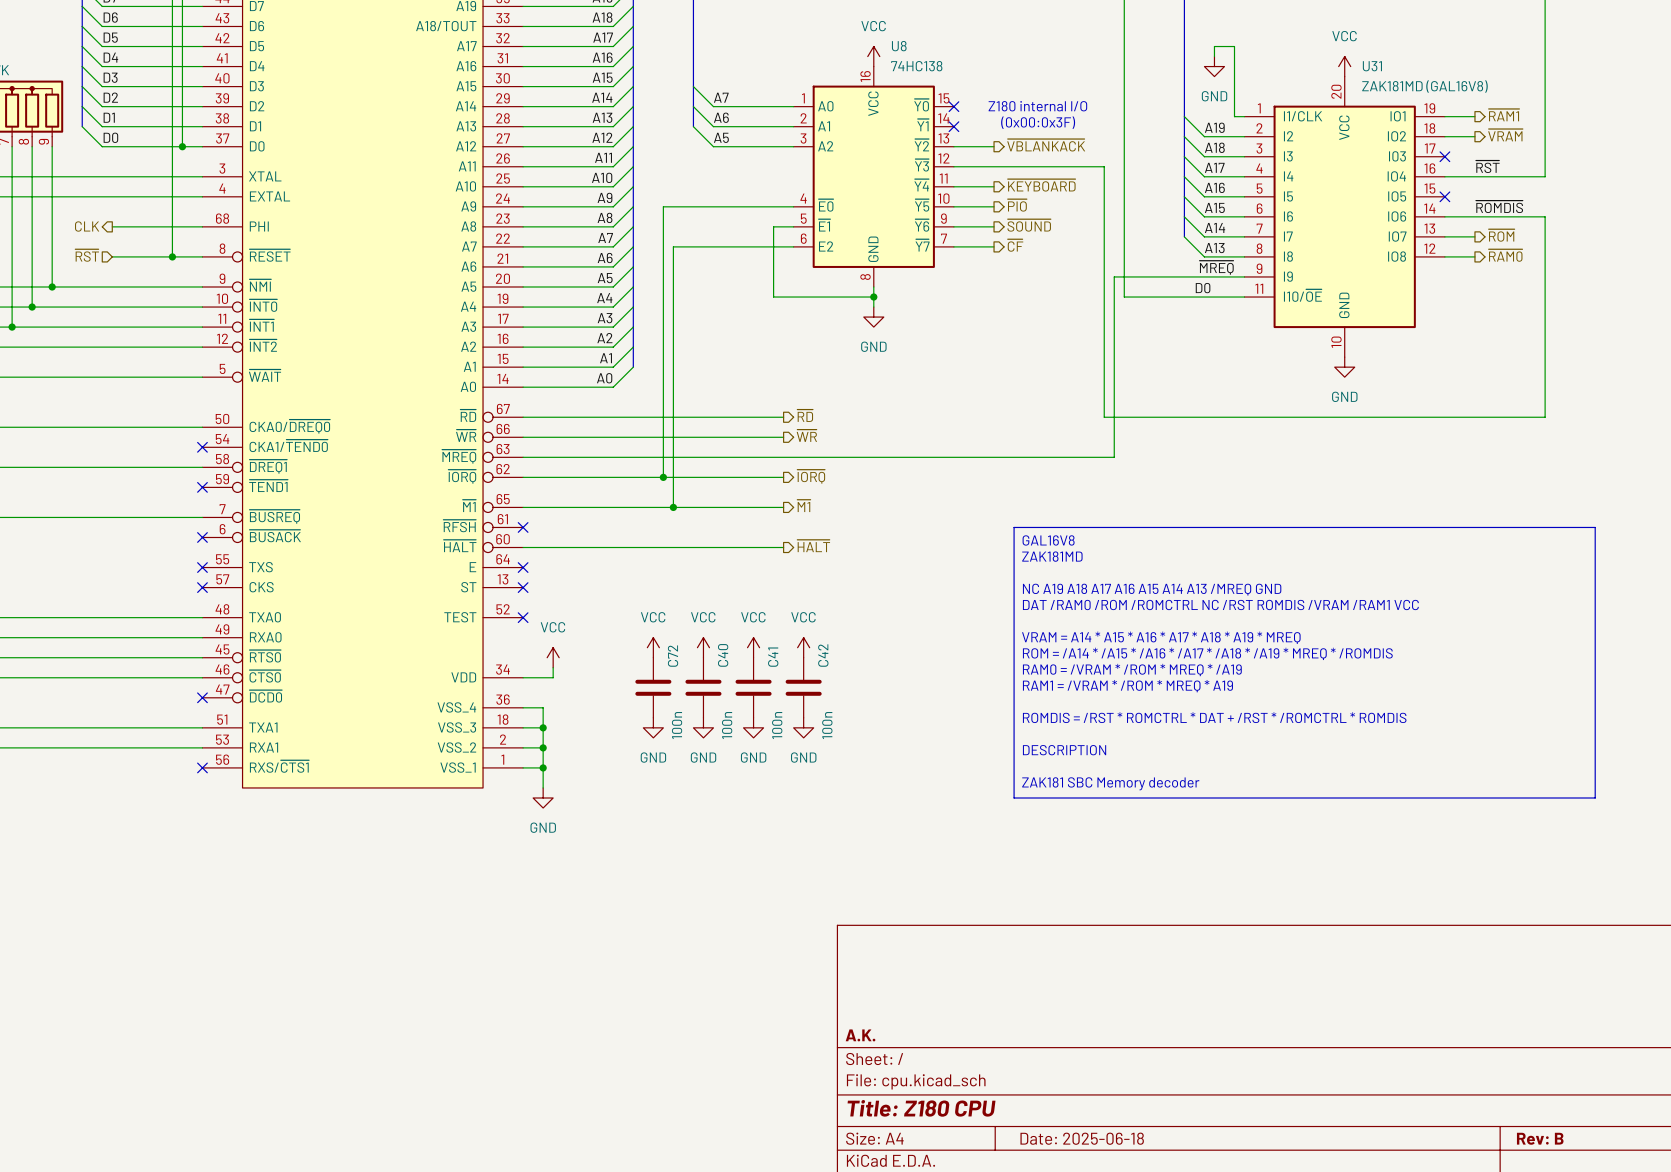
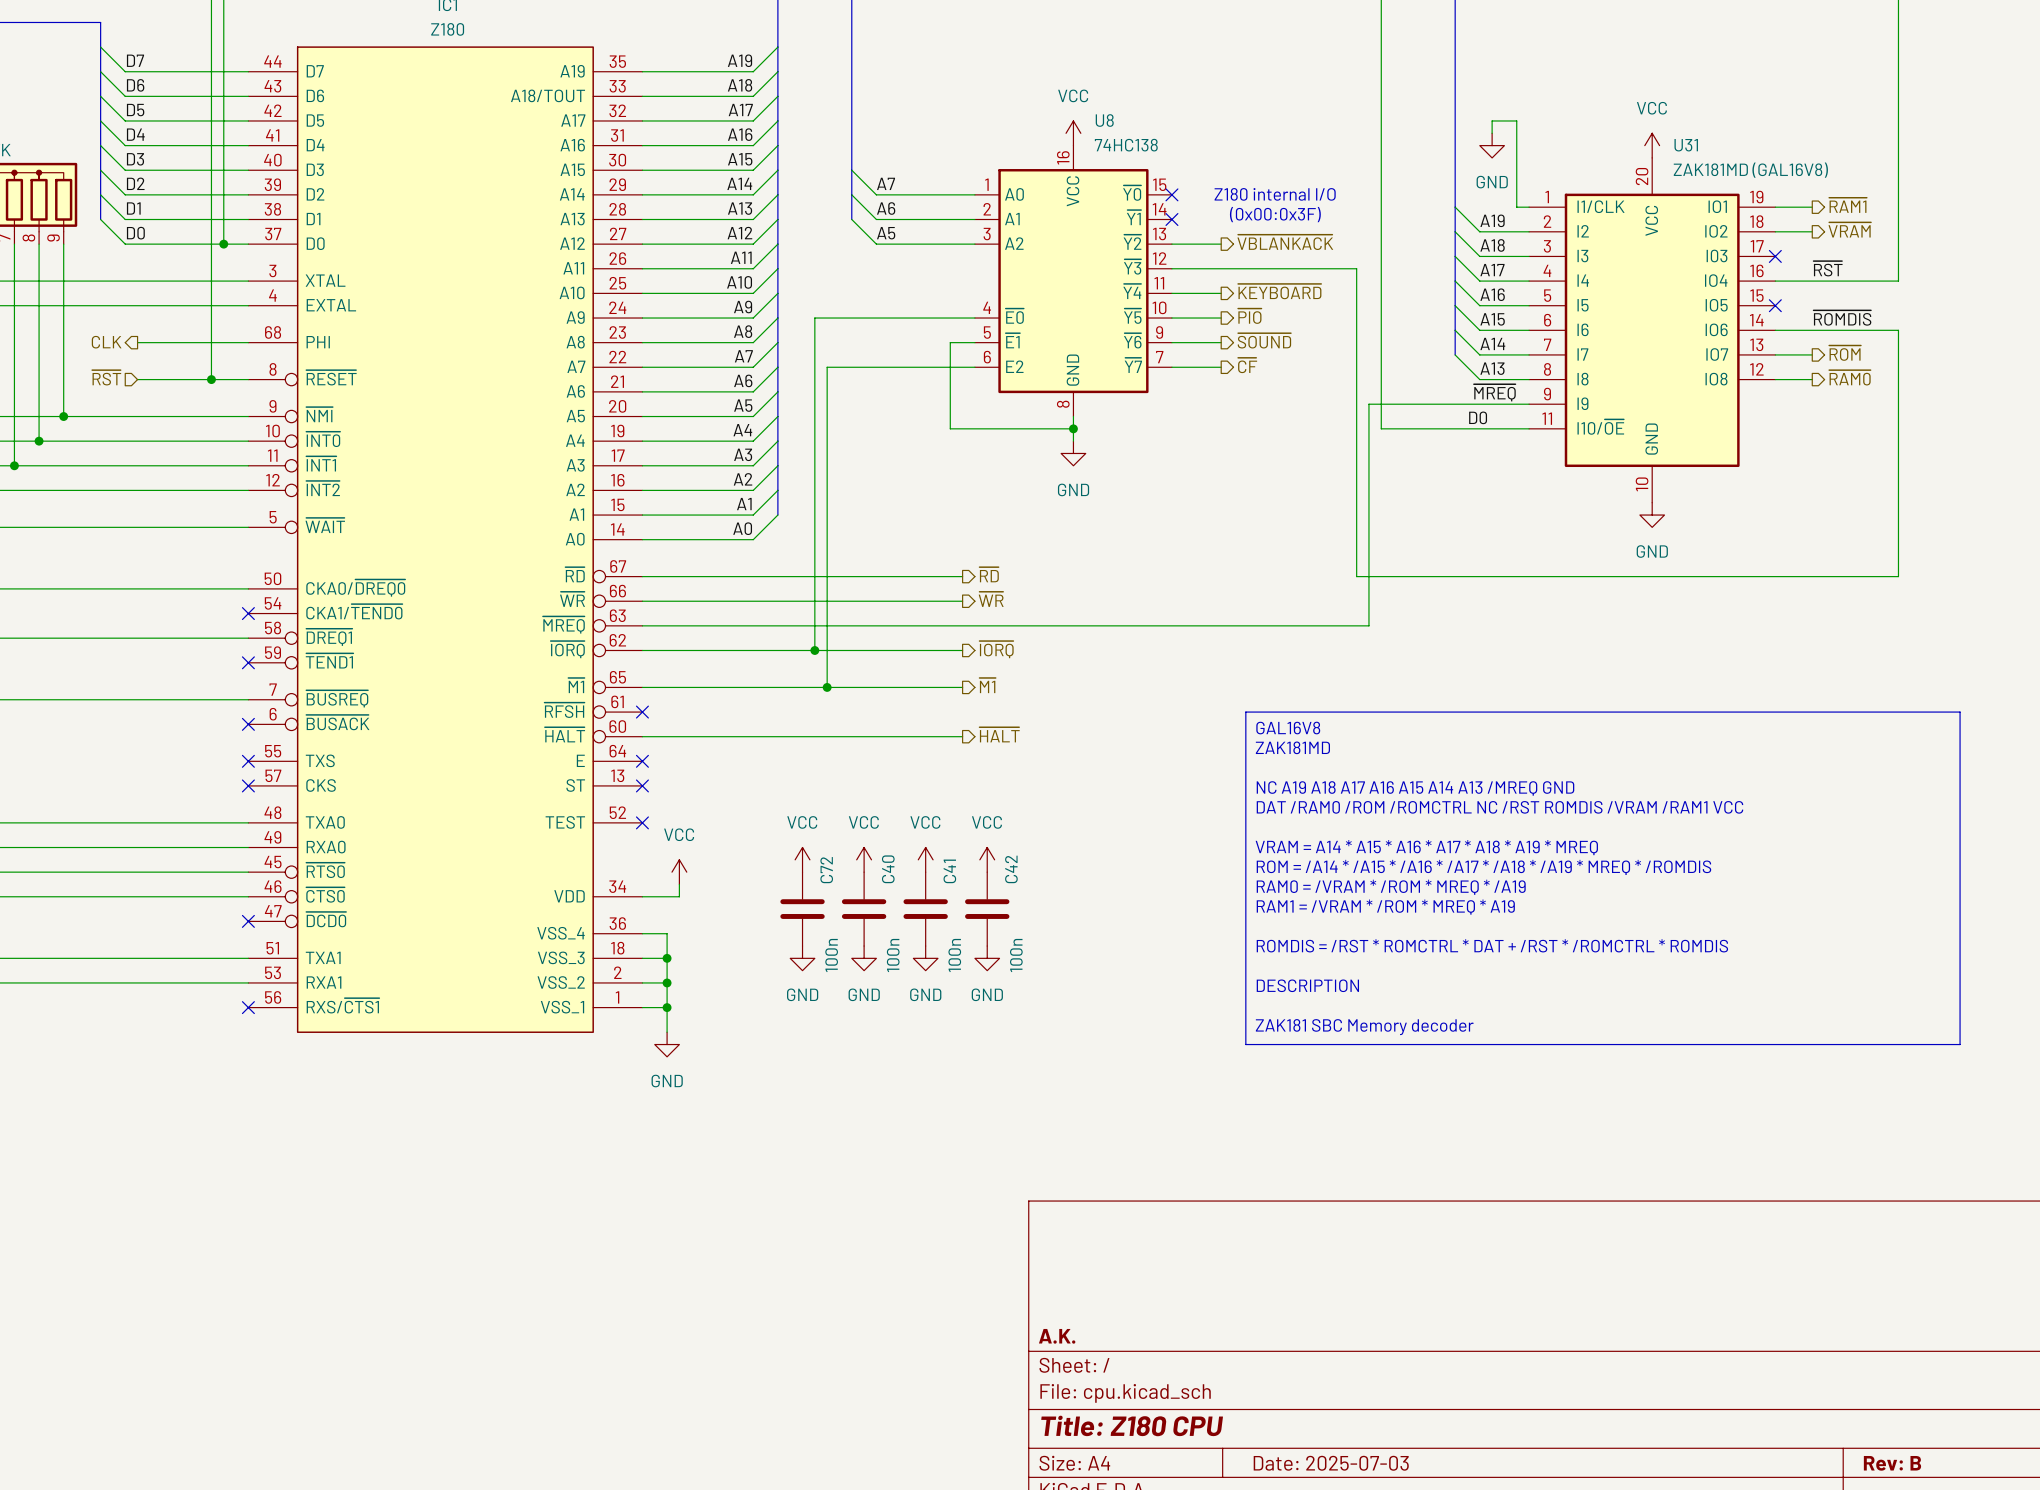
title block: Date: 2025-06-18 (1082, 1138) -> Date: 2025-07-03 (1331, 1463)

